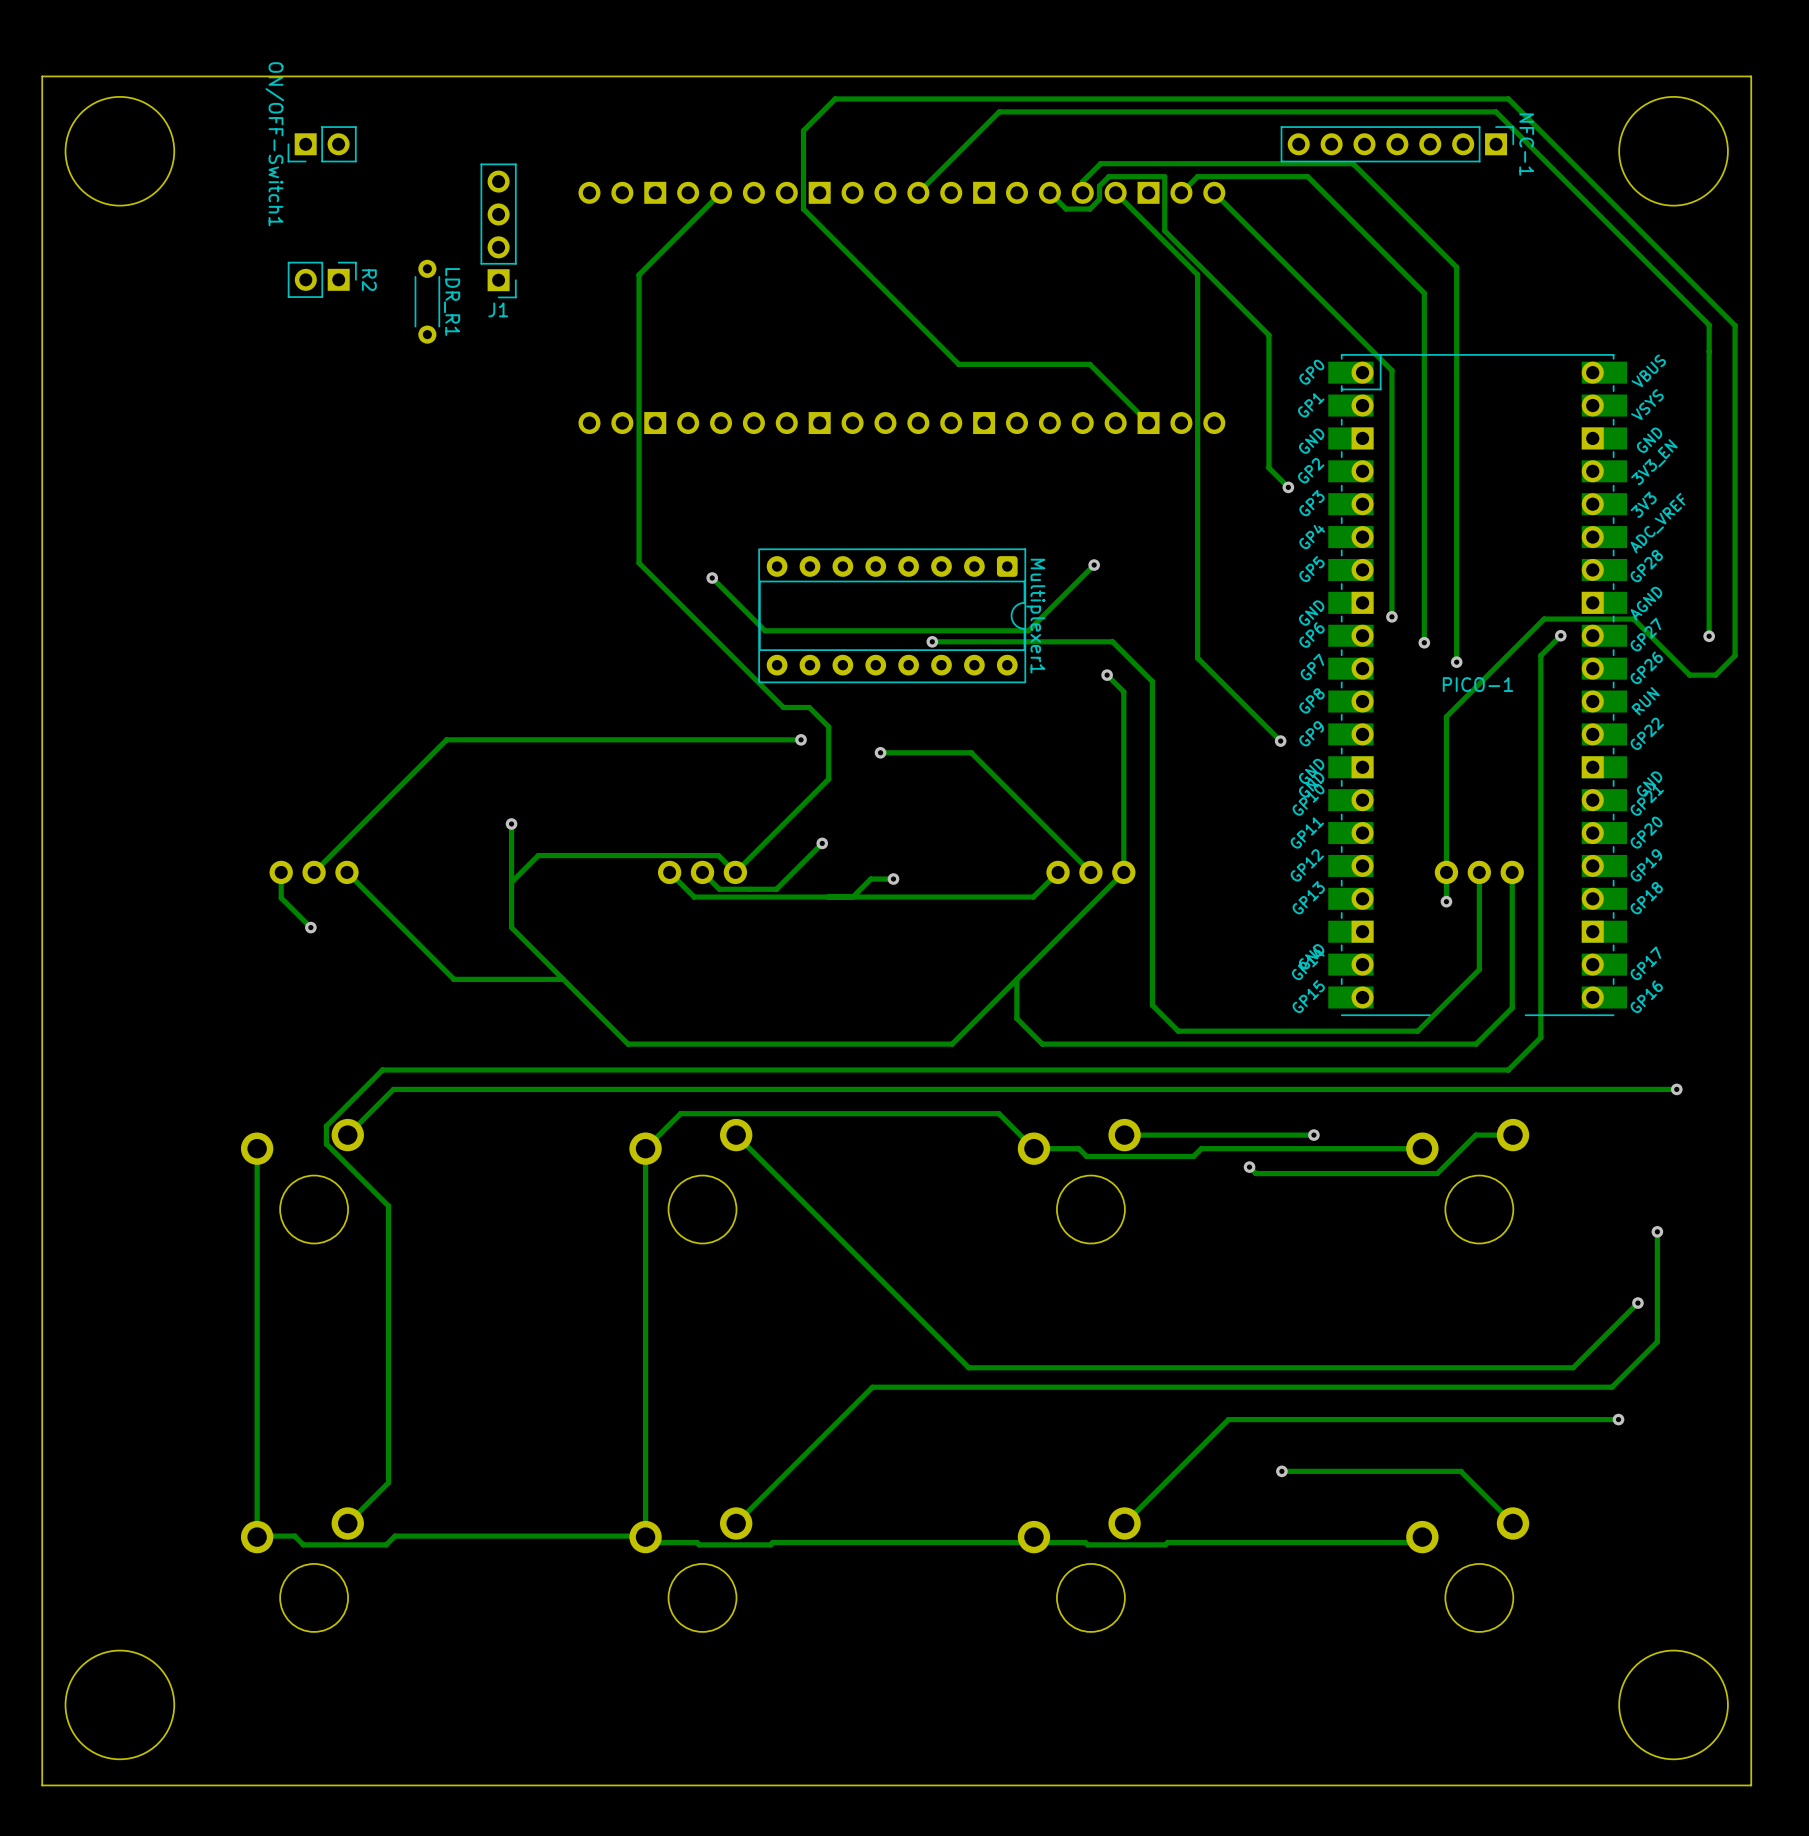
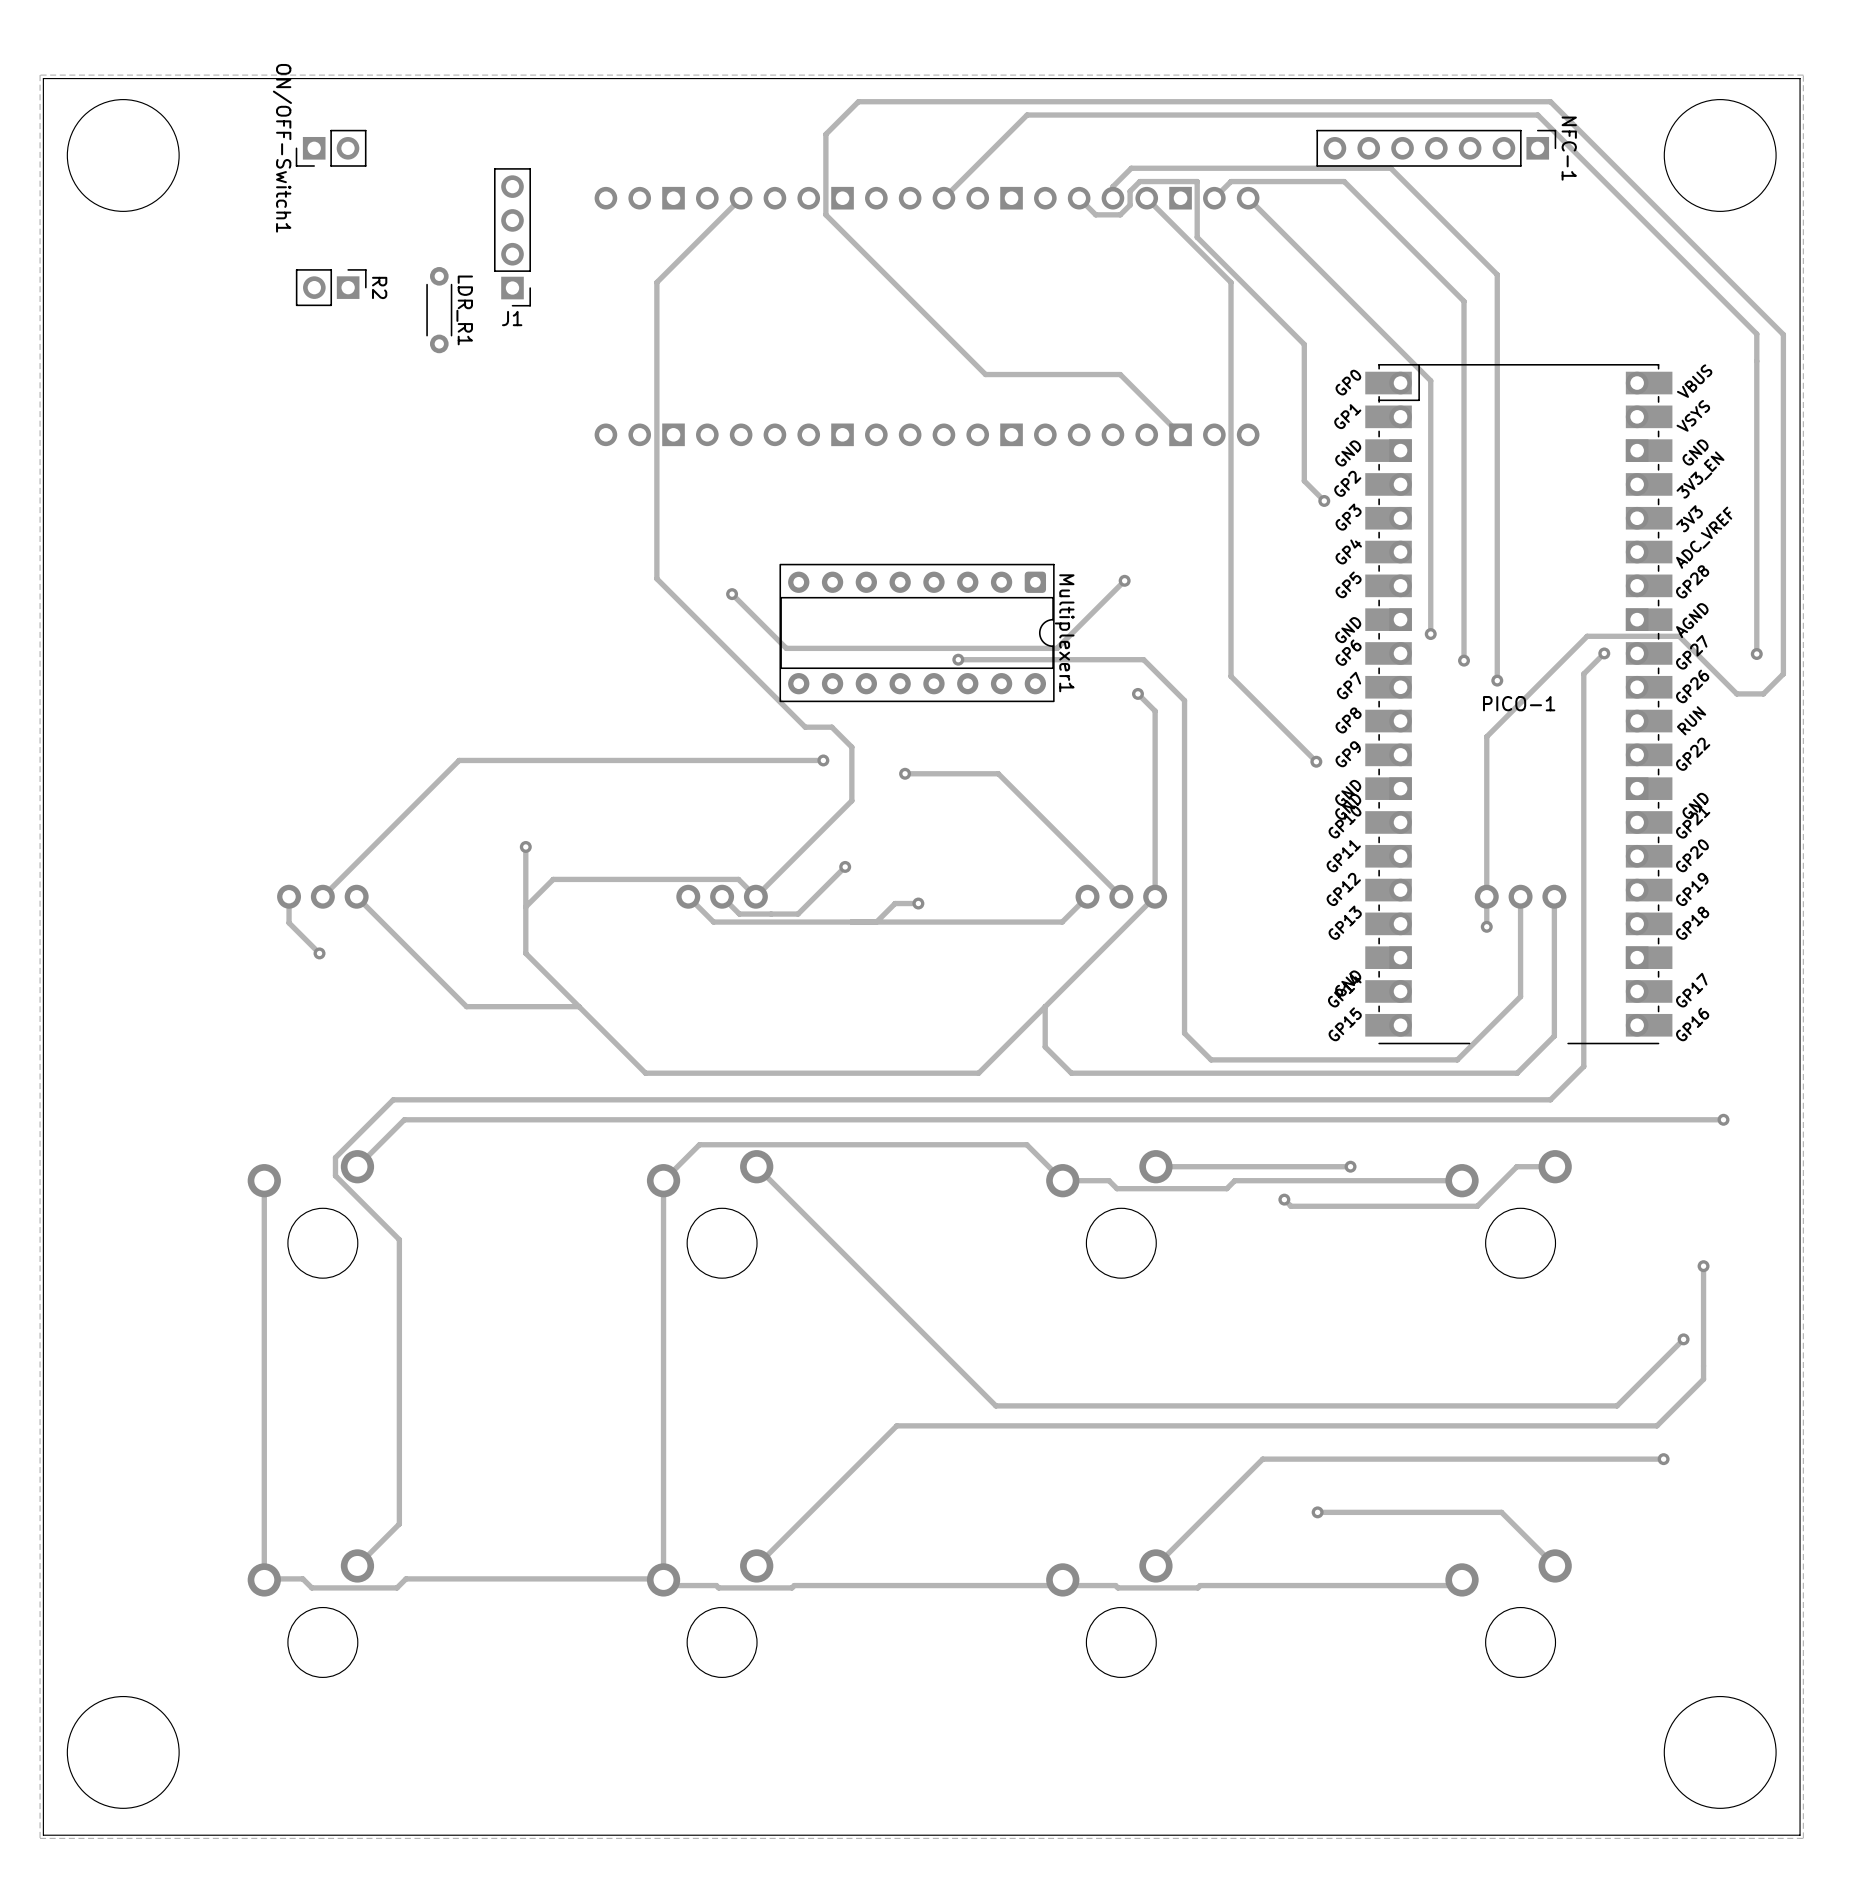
zone outline: none -> (1803, 75) (40, 75) (40, 1838) (1803, 1838) (1803, 75)

